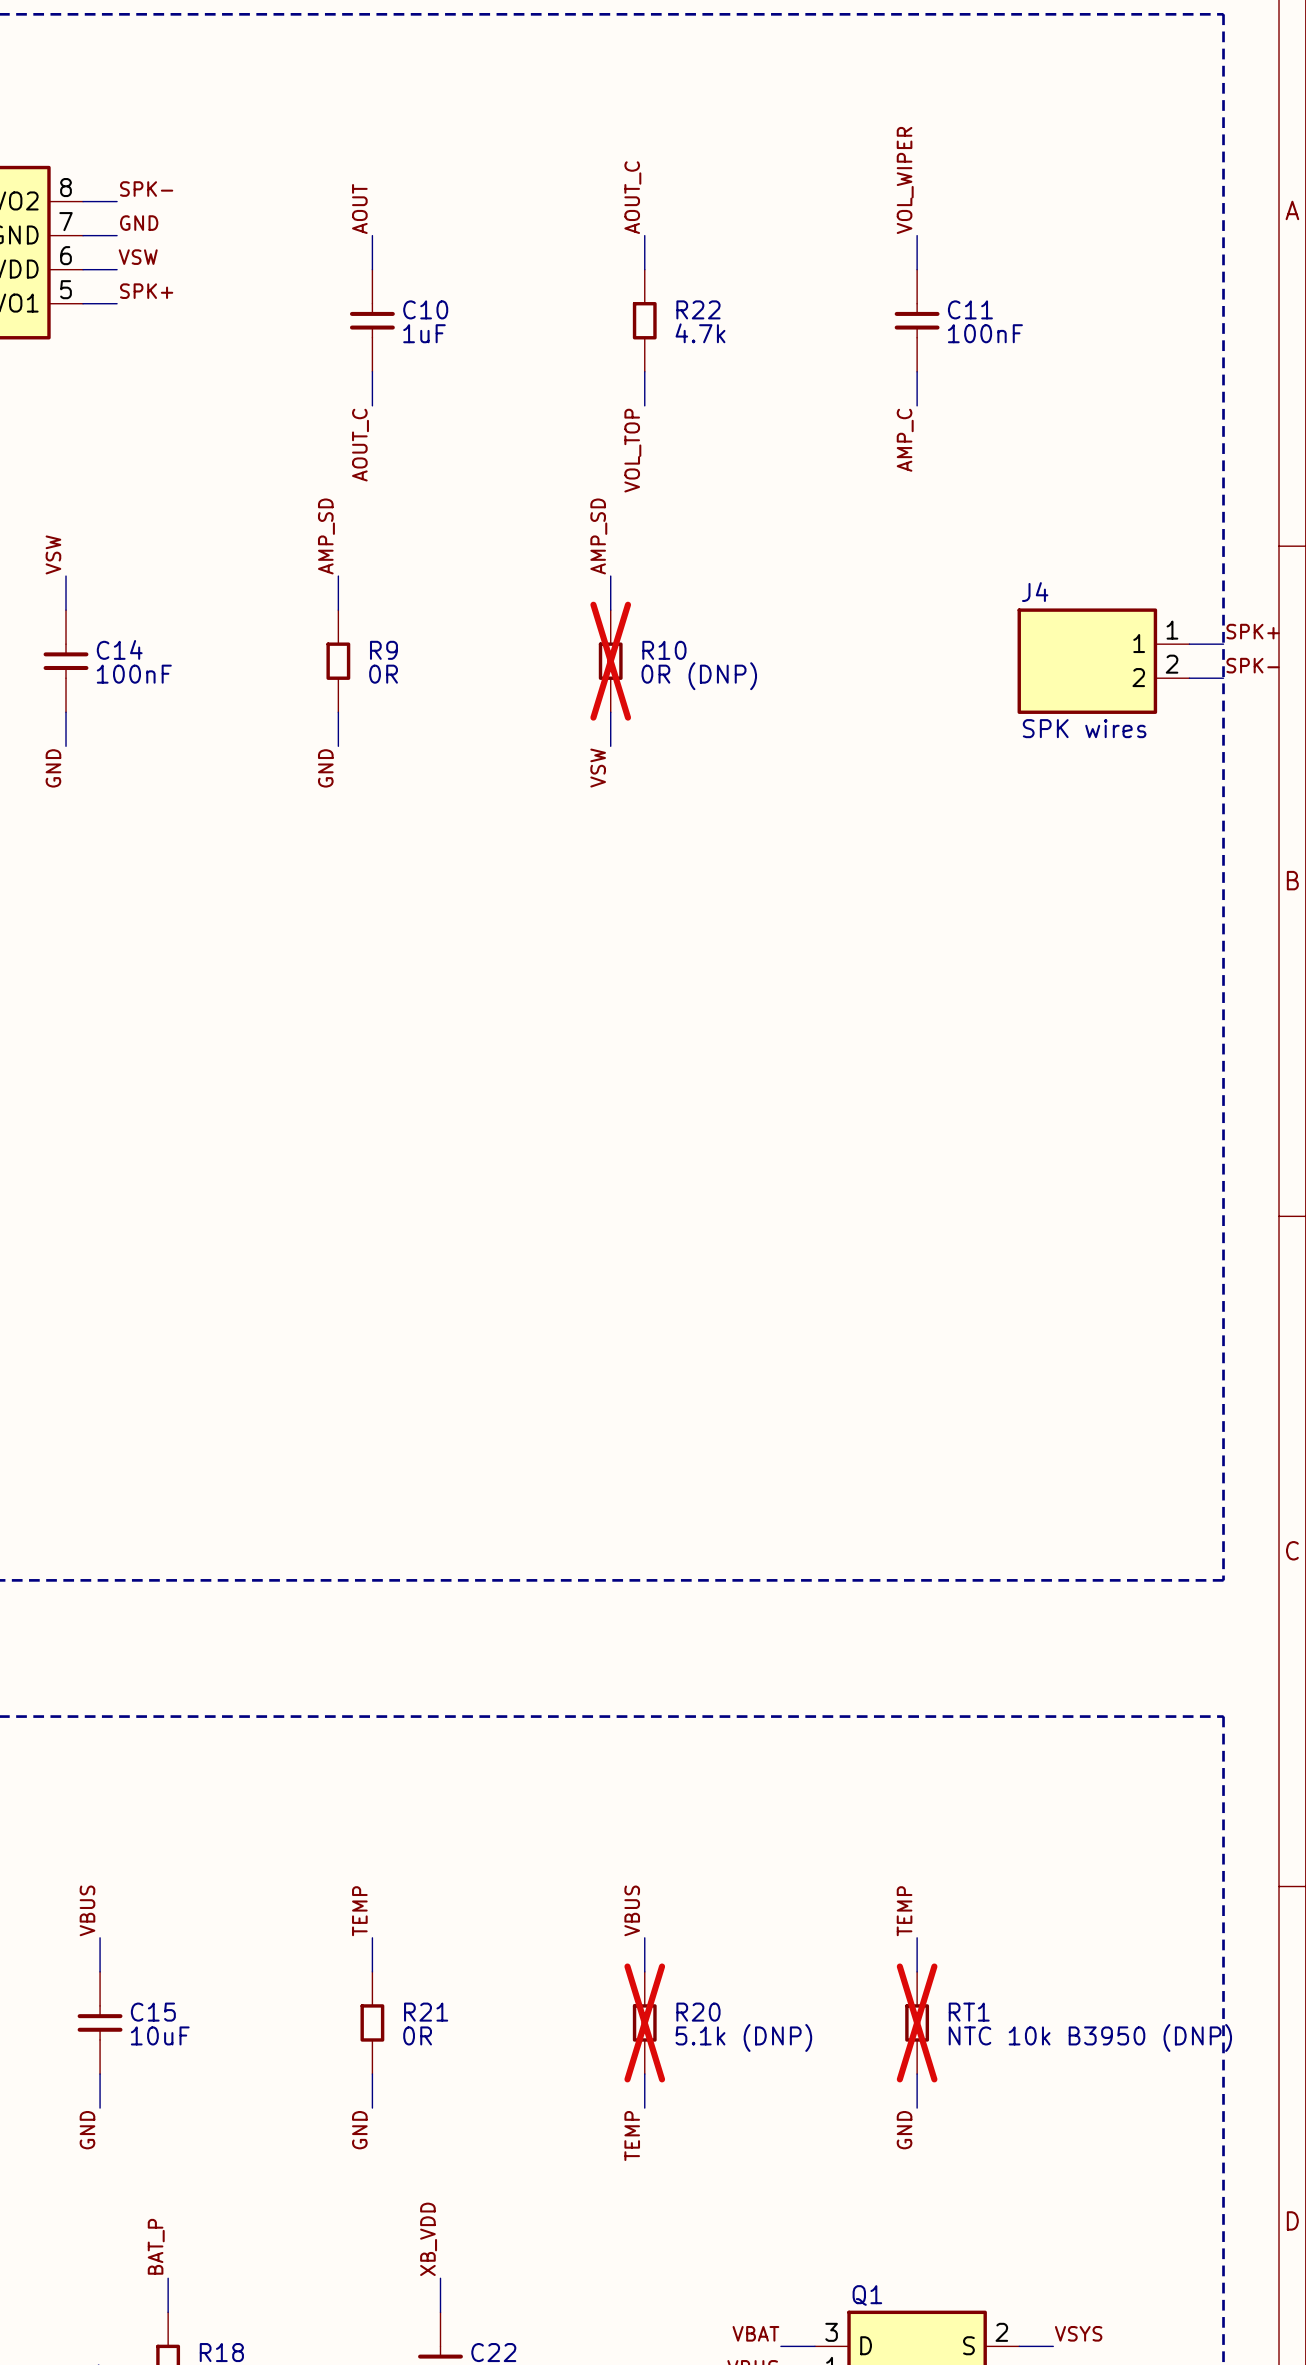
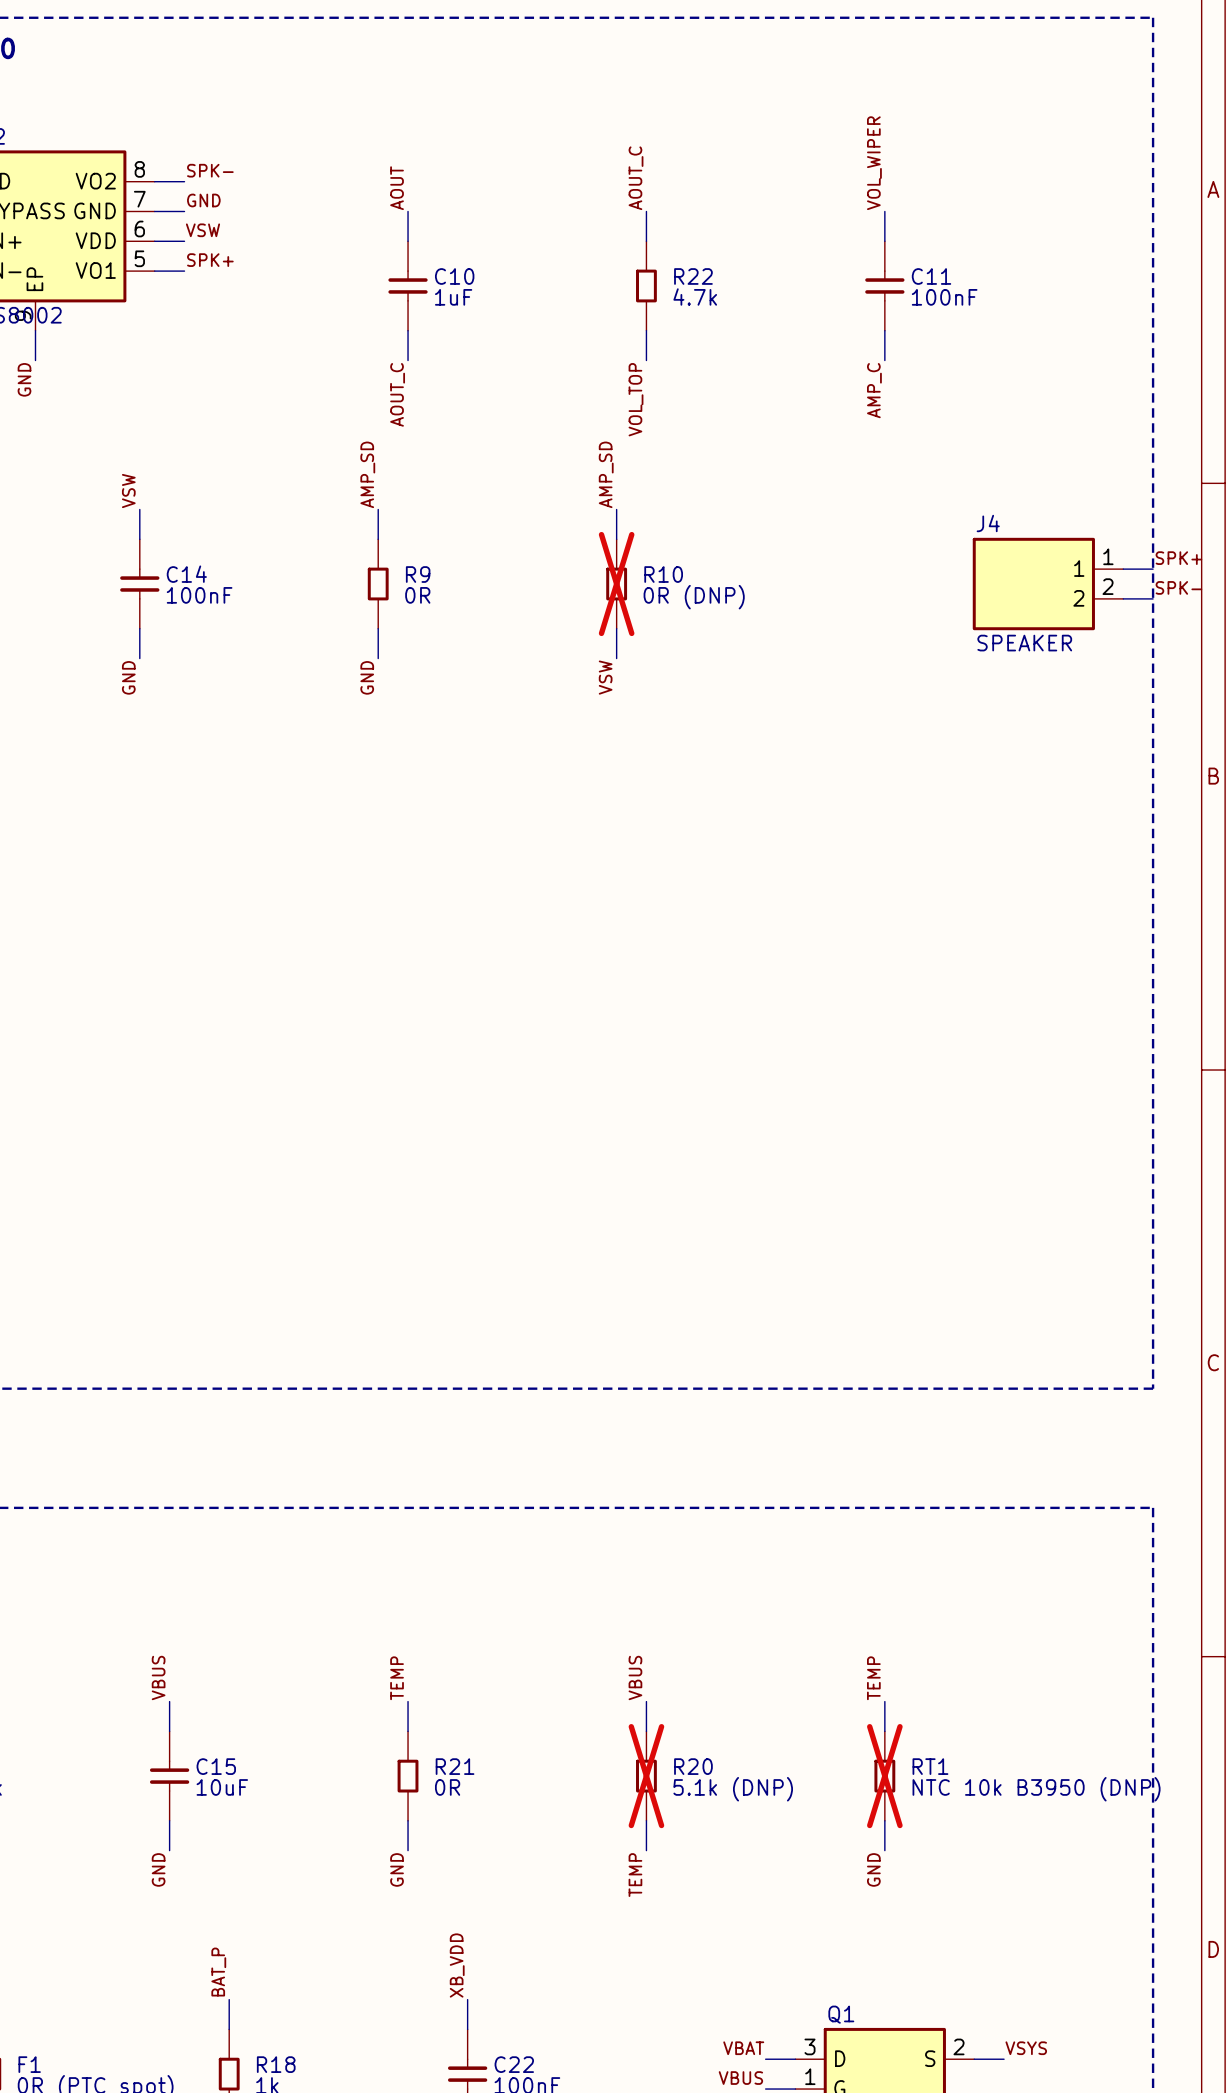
J4 value: SPK wires (1084, 728) -> SPEAKER (1024, 643)

